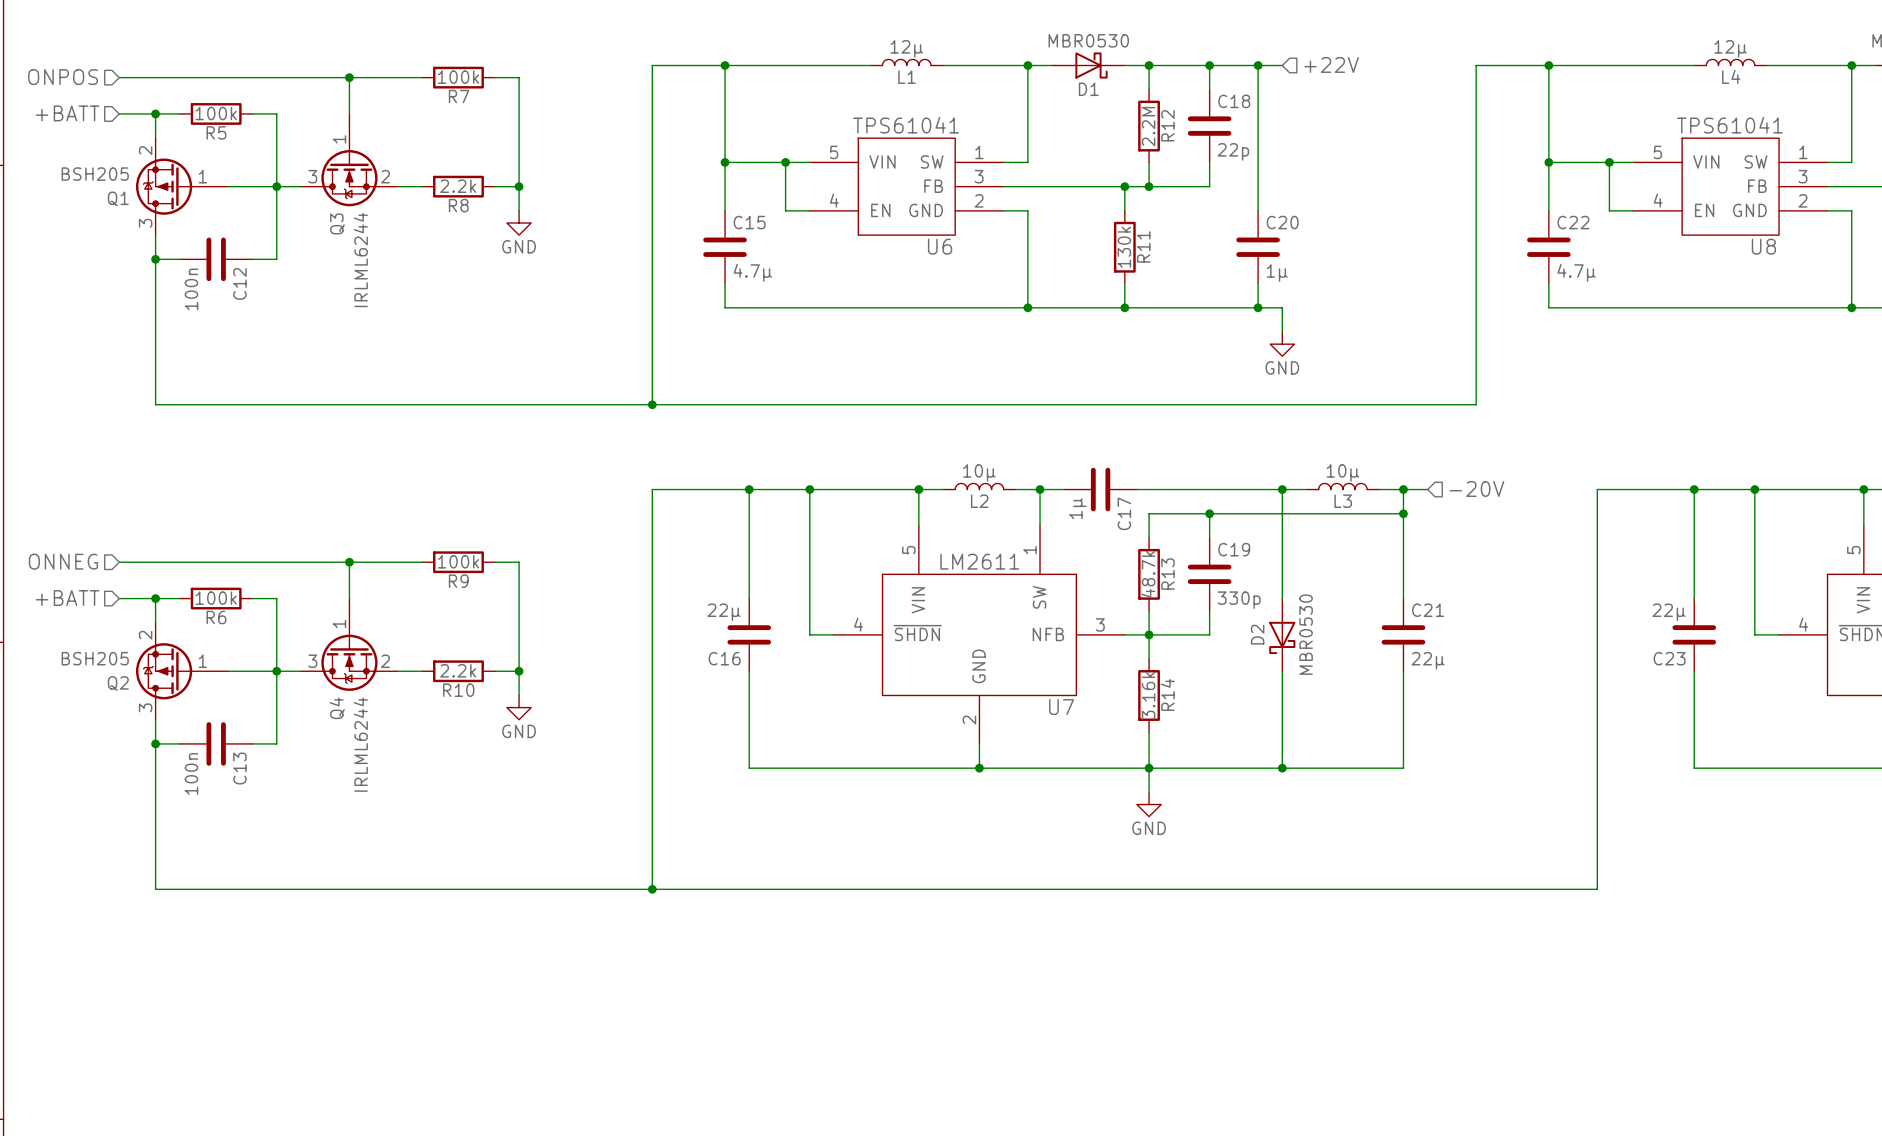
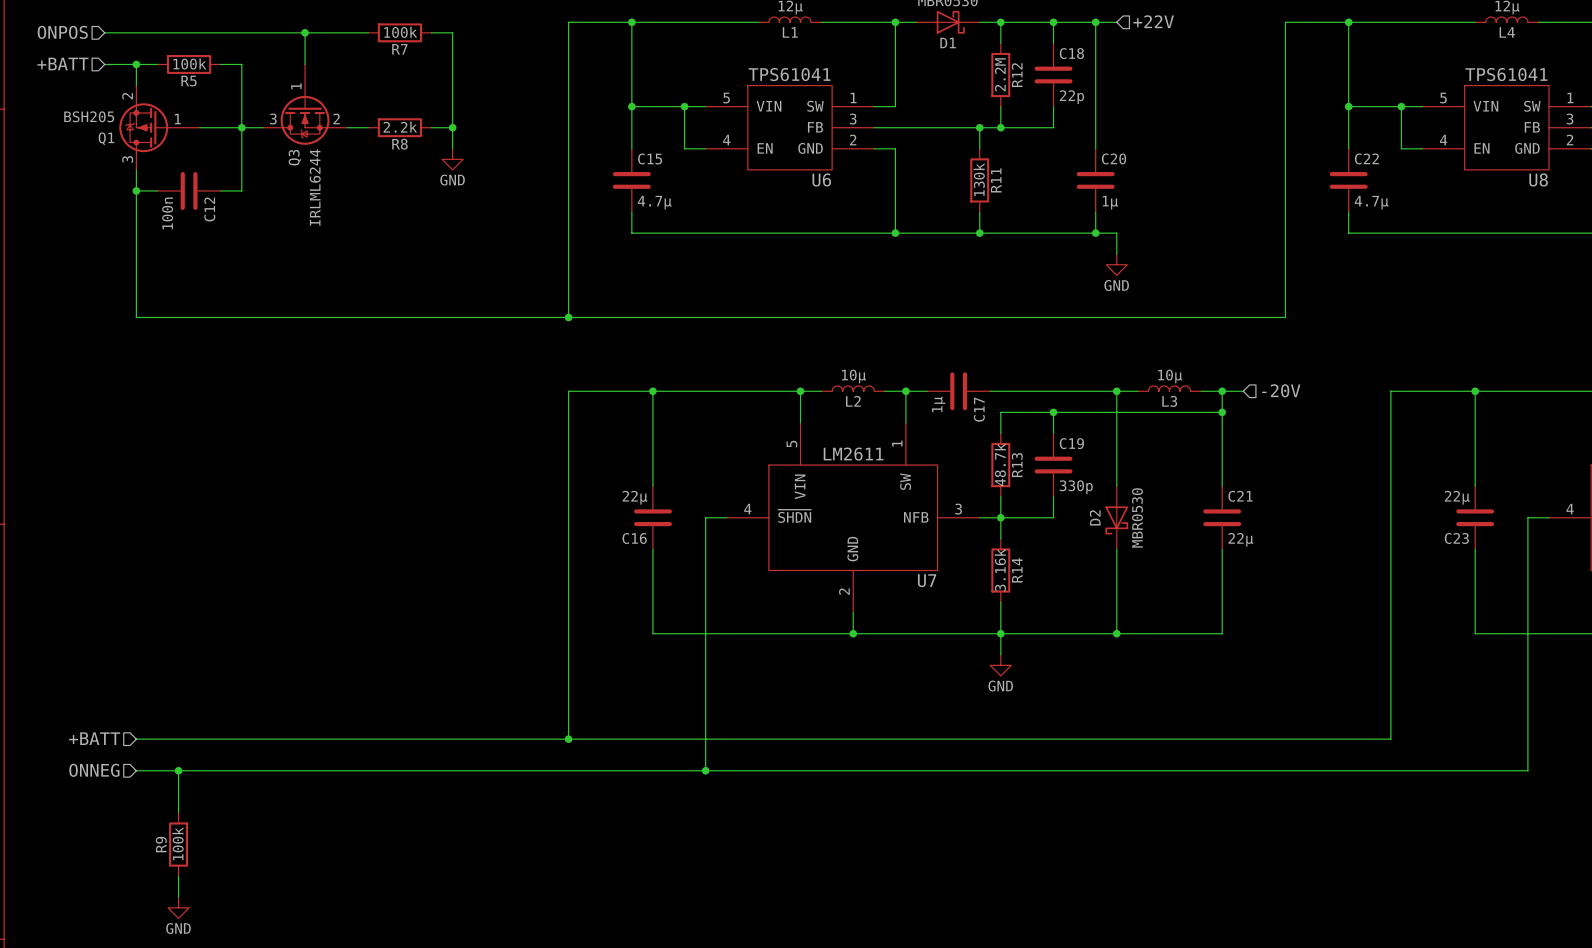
wire: (809, 489) (809, 634) -> (705, 770) (705, 517)
junction: (809, 489) -> none
wire: (1754, 489) (1754, 634) -> (136, 770) (1527, 770) (1527, 517)
junction: (1754, 489) -> none
hierarchical label: ONNEG (63, 561) -> none
wire: (119, 562) (422, 562) -> none
wire: (349, 562) (349, 598) -> none
junction: (349, 562) -> none
R9 rotation: 0° (458, 562) -> 90° clockwise (178, 844)
R9 position: (458, 562) -> (178, 844)
wire: (494, 562) (519, 562) (519, 695) -> none
hierarchical label: +BATT (67, 598) -> none
wire: (119, 598) (179, 598) -> none
wire: (155, 598) (155, 622) -> none
junction: (155, 598) -> none
R6: 100k (216, 598) -> none
wire: (252, 598) (276, 598) (276, 743) (252, 743) -> none
Q4: IRLML6244 (349, 644) -> none
Q2: BSH205 (182, 671) -> none
wire: (228, 671) (300, 671) -> none
junction: (276, 671) -> none
wire: (397, 671) (422, 671) -> none
R10: 2.2k (458, 671) -> none
wire: (494, 671) (519, 671) -> none
junction: (519, 671) -> none
power symbol: GND (519, 707) -> none
wire: (155, 719) (155, 889) -> none
wire: (155, 743) (179, 743) -> none
junction: (155, 743) -> none
C13: 100n (216, 743) -> none
hierarchical label: none -> +BATT (94, 738)
hierarchical label: none -> ONNEG (94, 770)
wire: none -> (178, 770) (178, 812)
junction: none -> (178, 770)
junction: none -> (705, 770)
wire: none -> (178, 876) (178, 897)
power symbol: none -> GND (178, 907)

